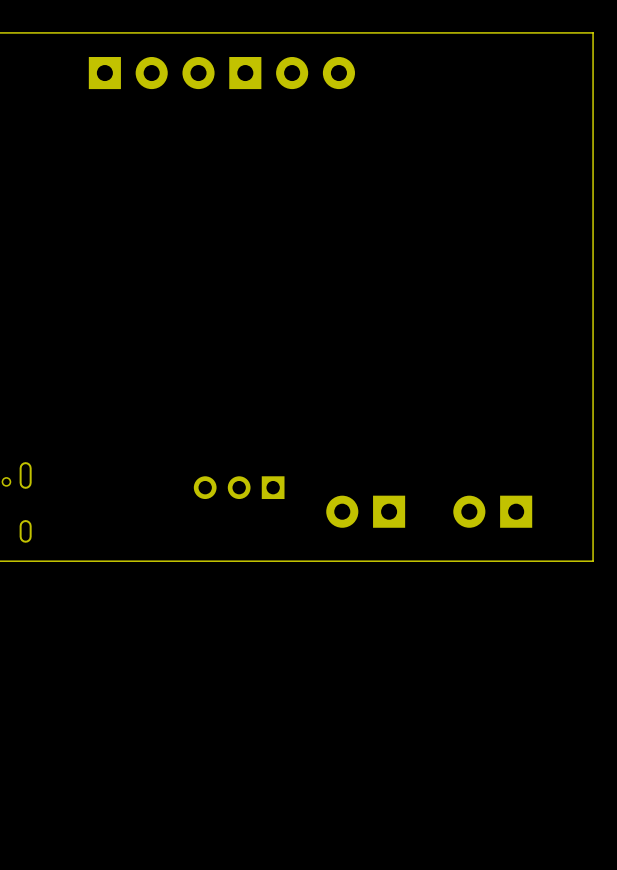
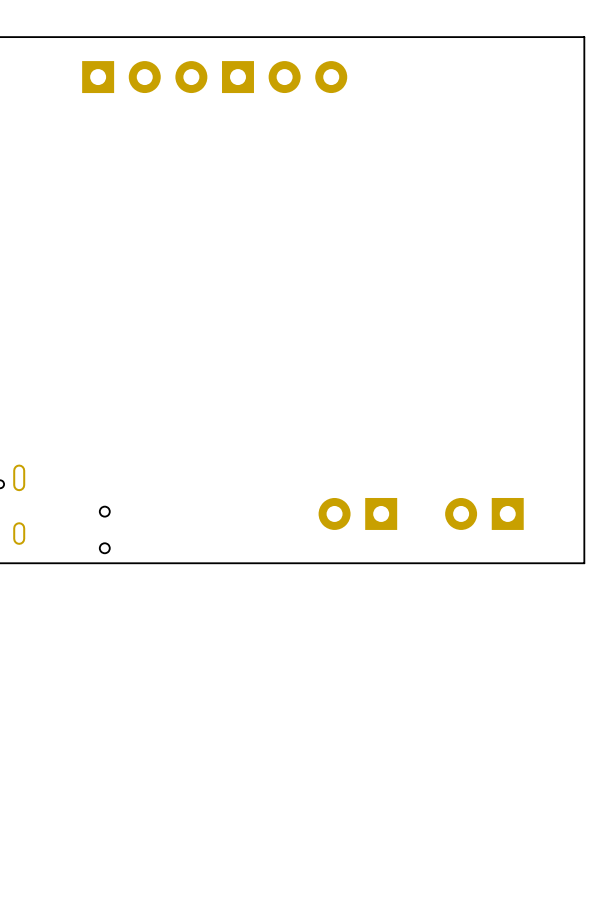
part: (239, 487) -> none
part: none -> (104, 529)

